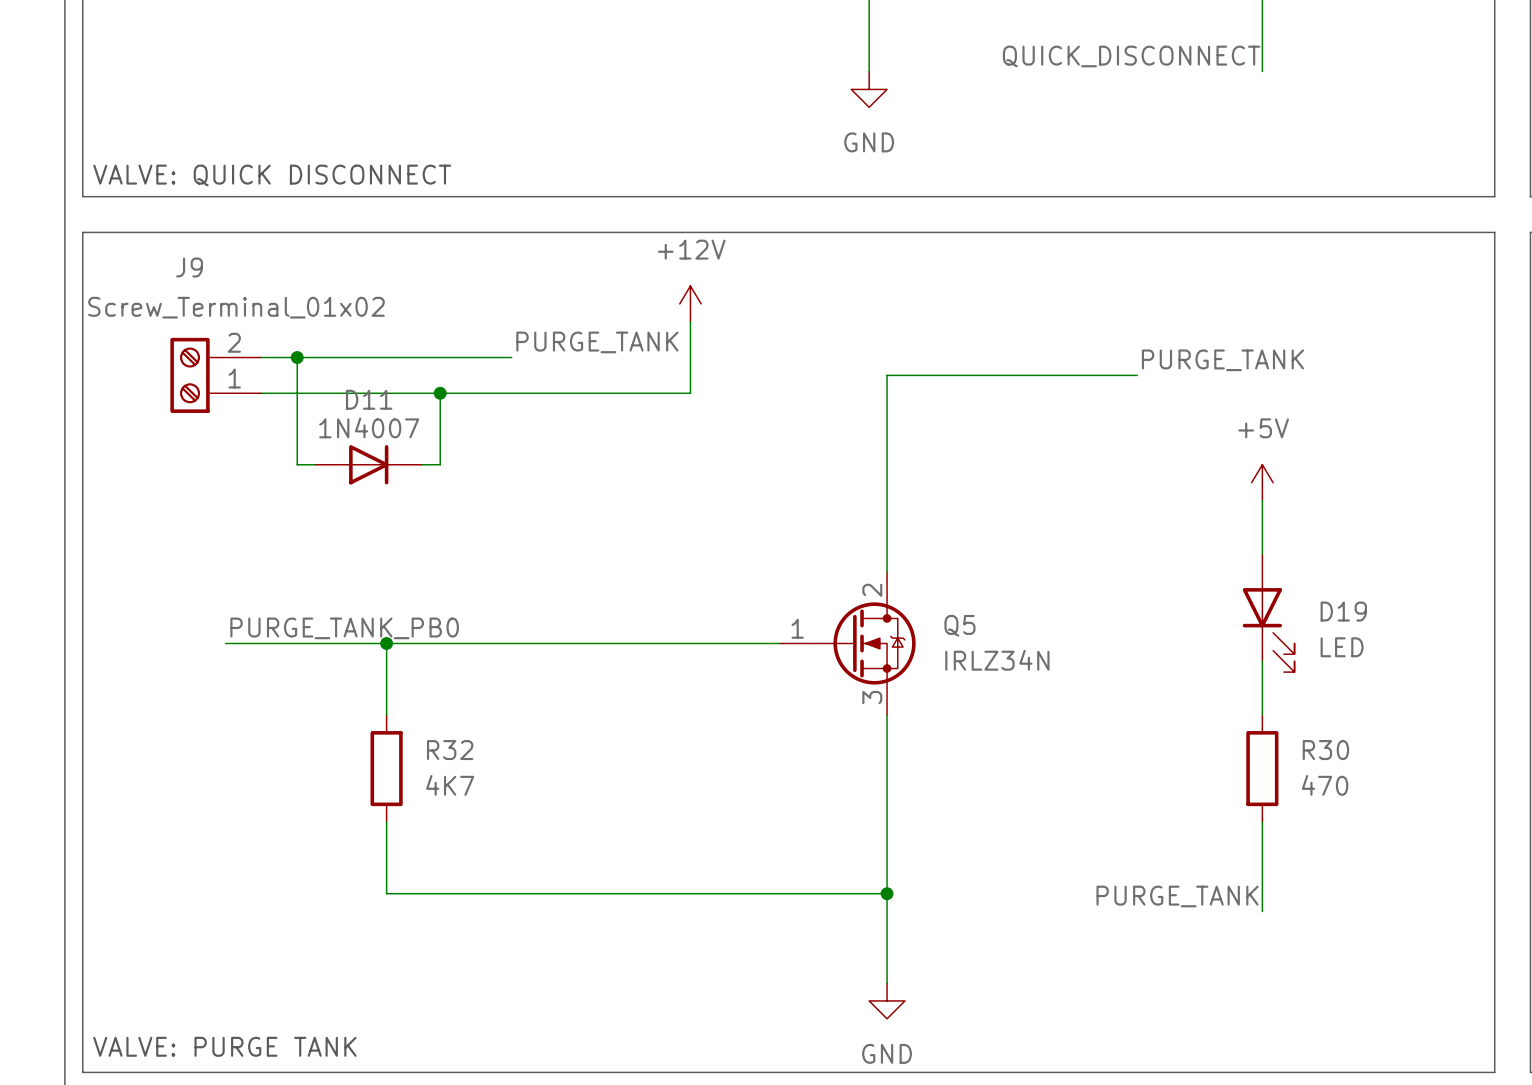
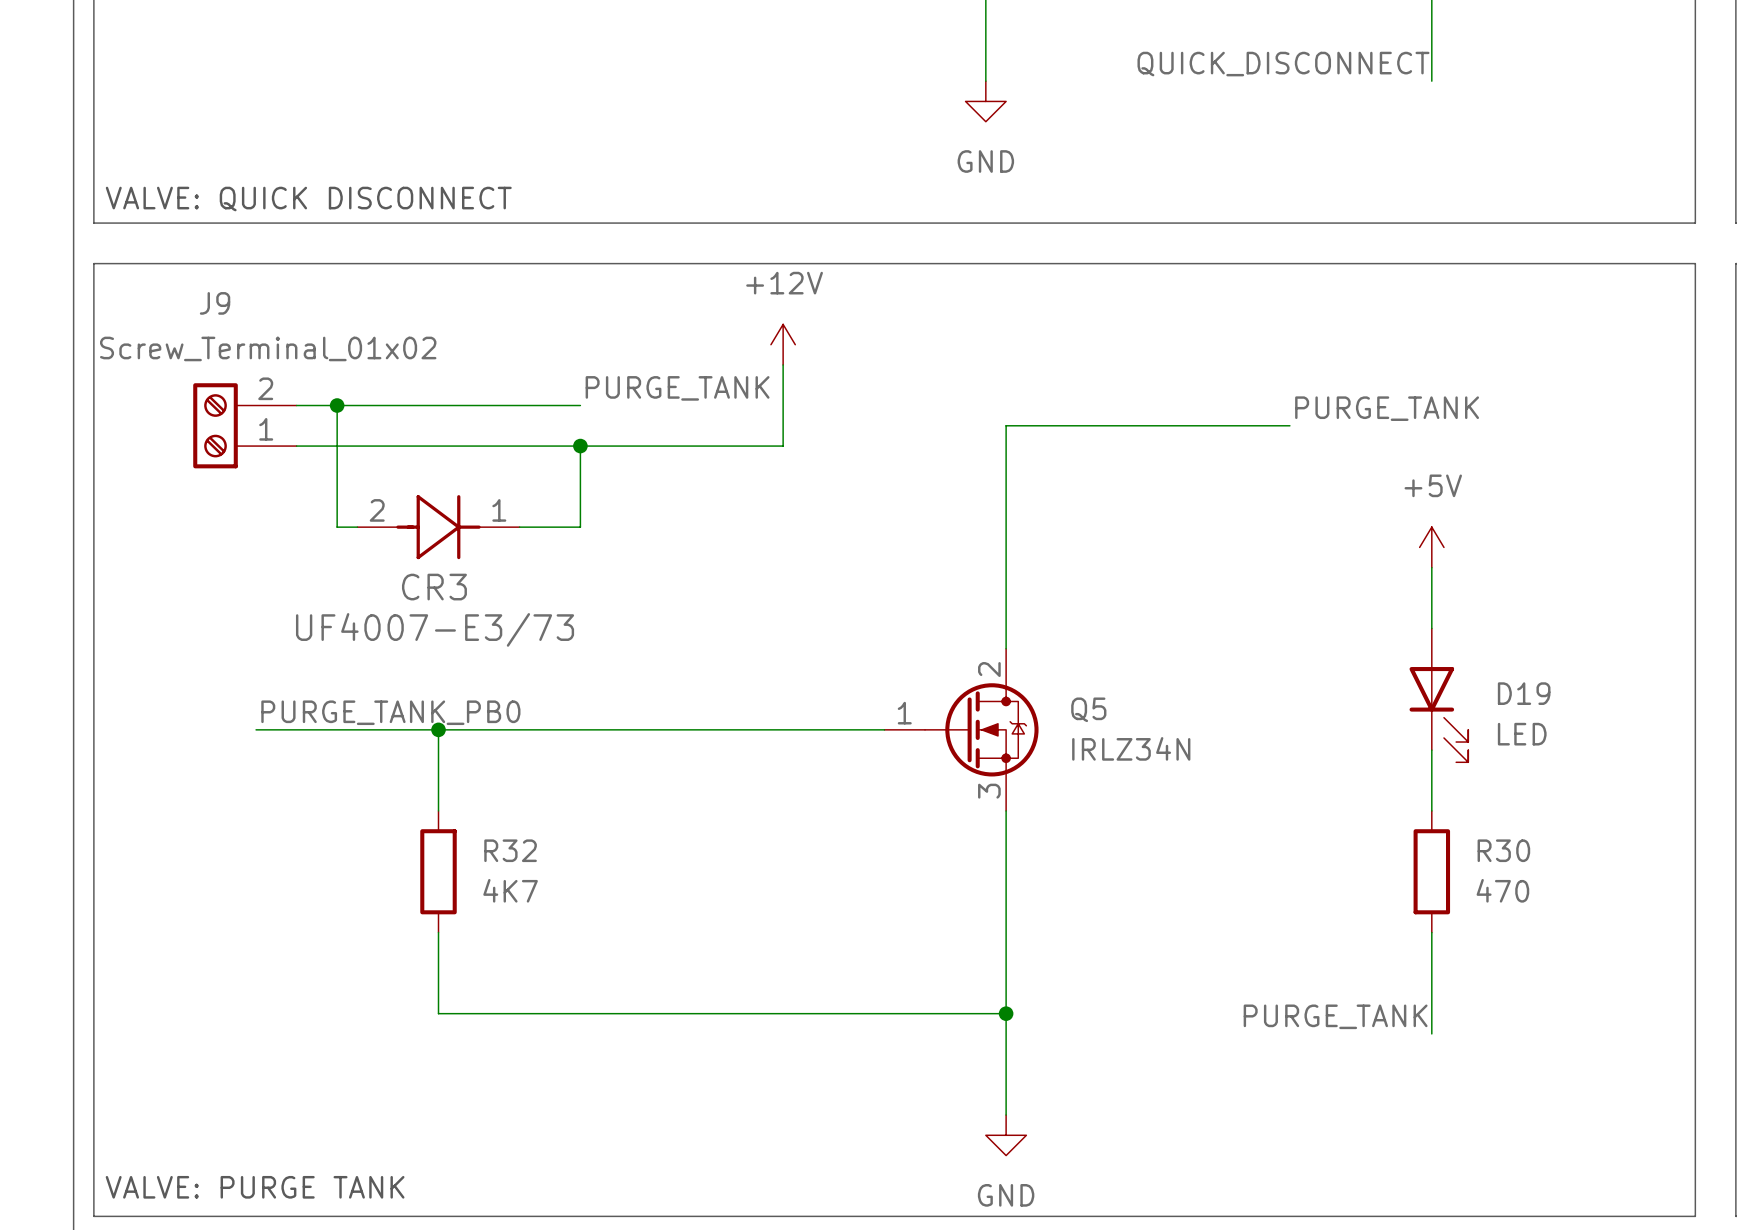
wire: (440, 393) (440, 464) (422, 464) -> none
junction position: (440, 393) -> (580, 446)
wire: none -> (580, 446) (580, 527) (519, 527)
D11: 1N4007 (368, 464) -> none
CR3: none -> UF4007-E3/73 (438, 527)

